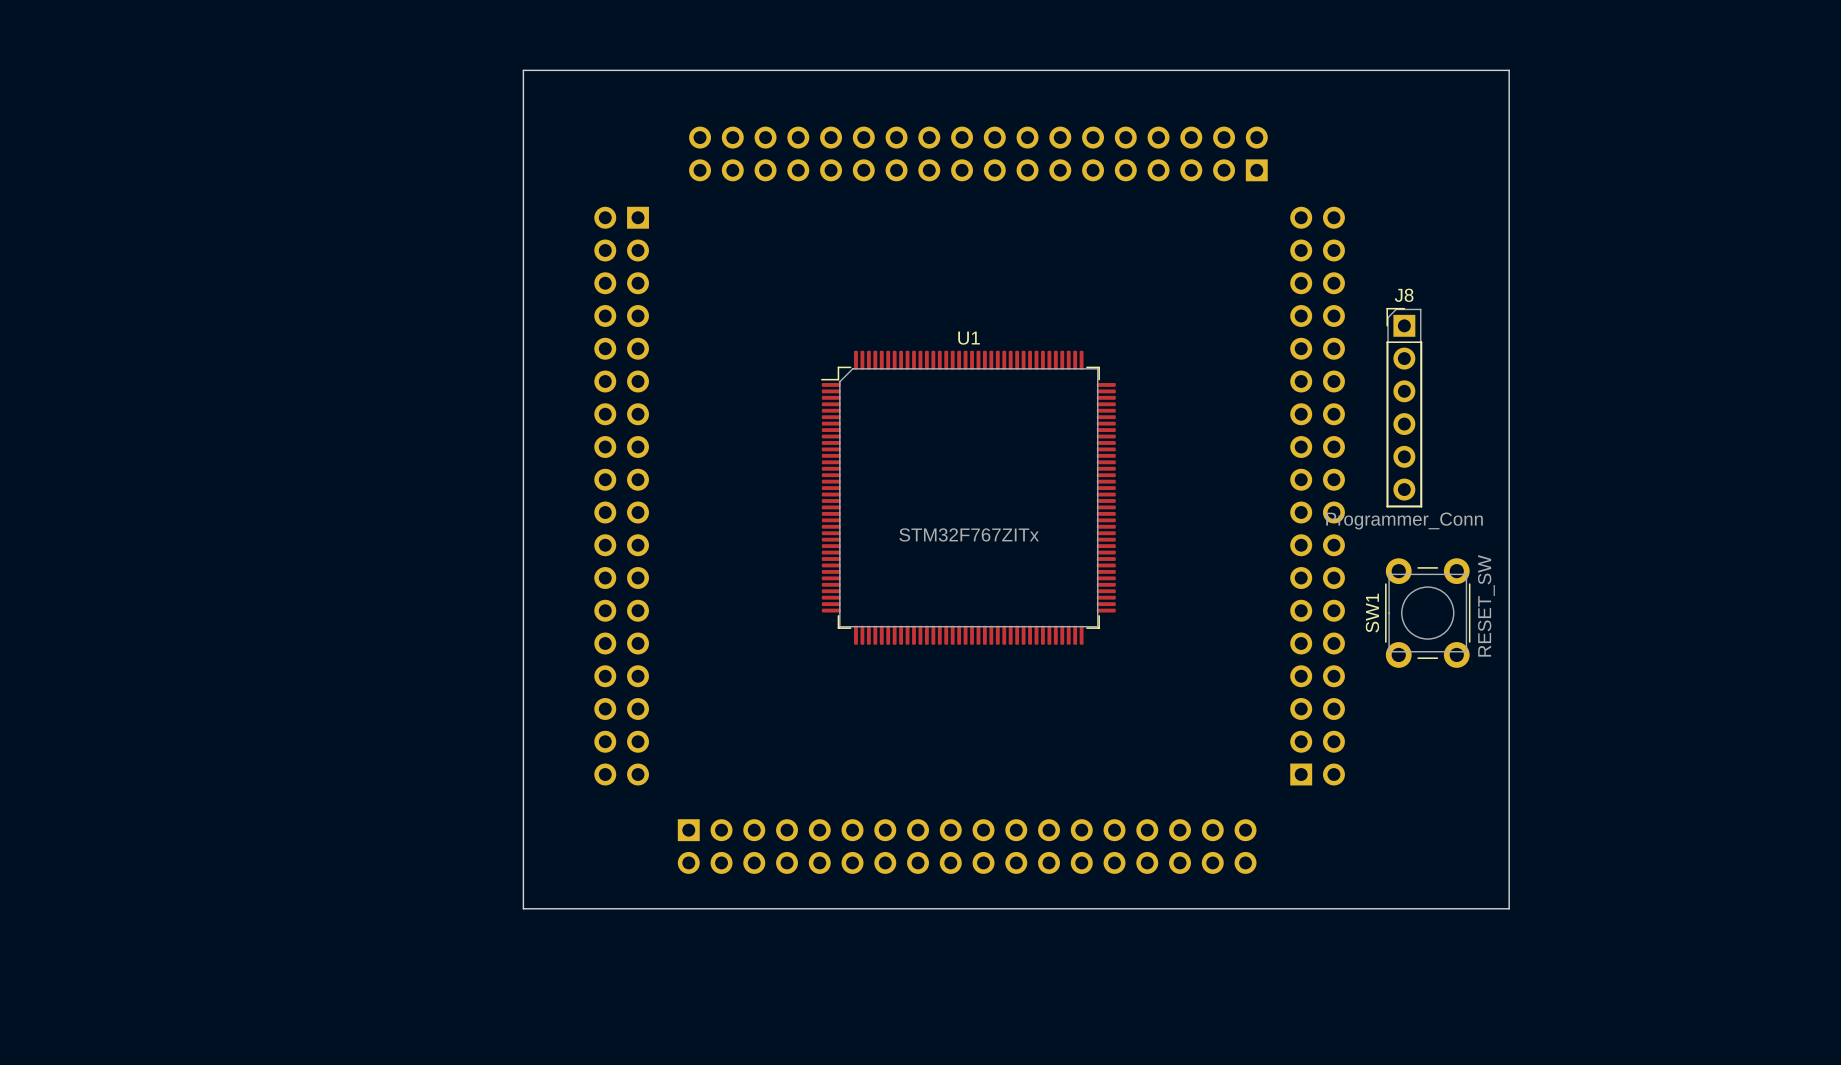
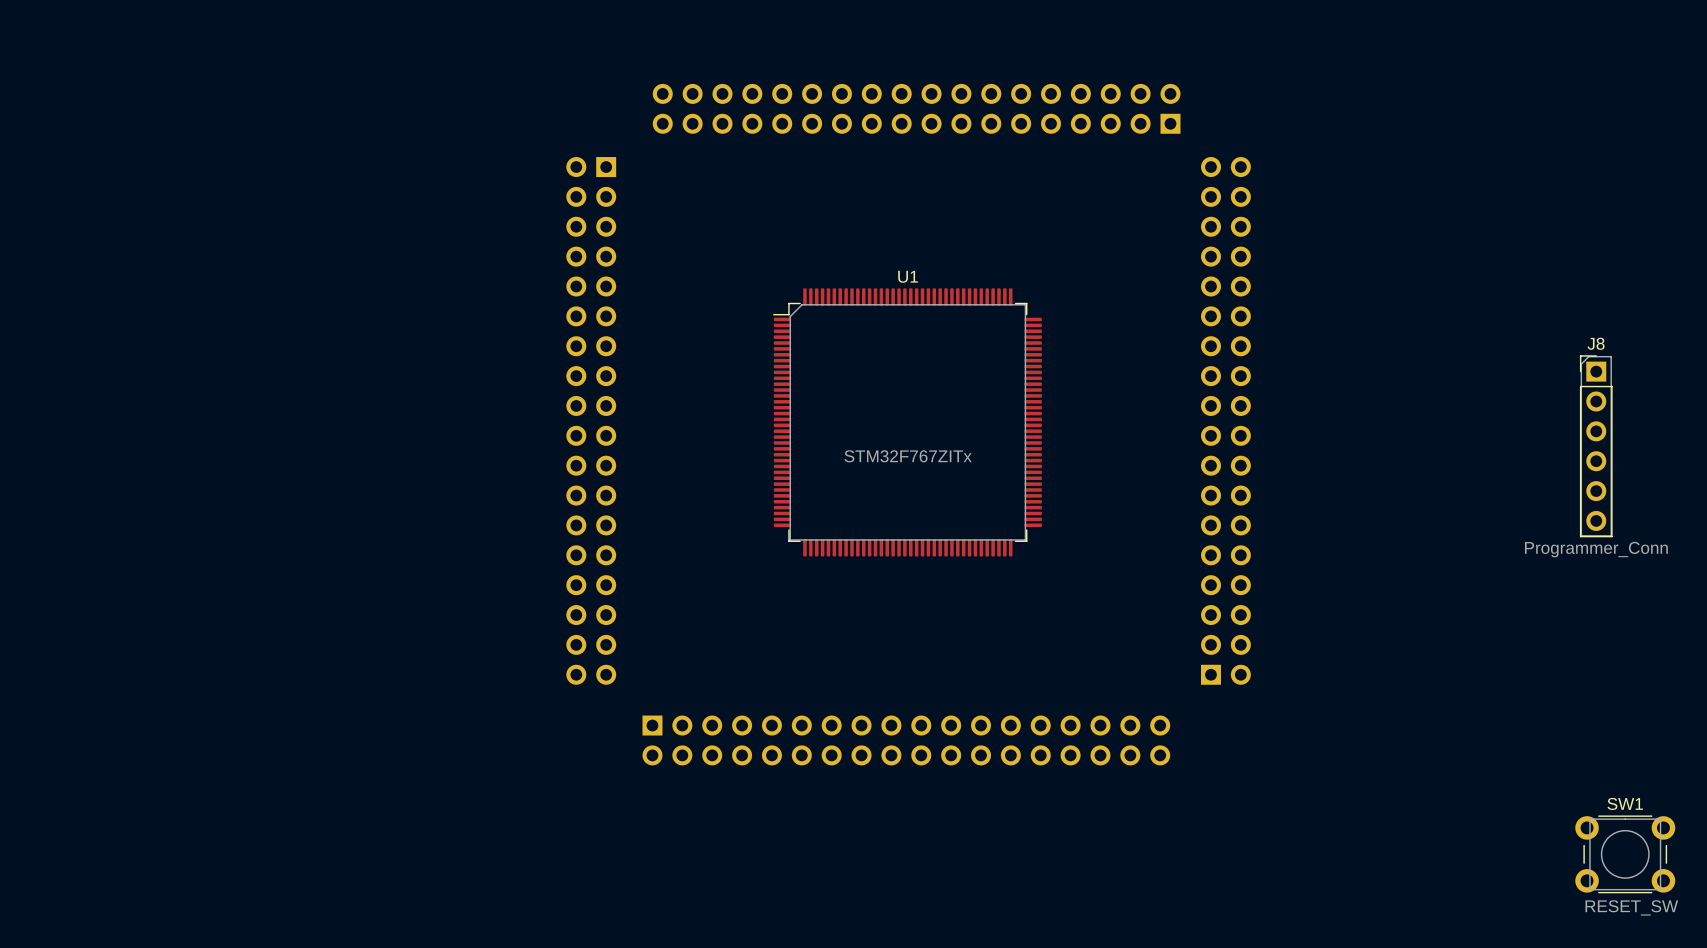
board edge: (523, 70) (1509, 70) (1509, 908) (523, 908) (523, 70) -> none
J8 position: (1404, 407) -> (1596, 446)
SW1 rotation: 0° (1427, 613) -> 90° clockwise (1625, 854)
SW1 position: (1427, 613) -> (1625, 854)

